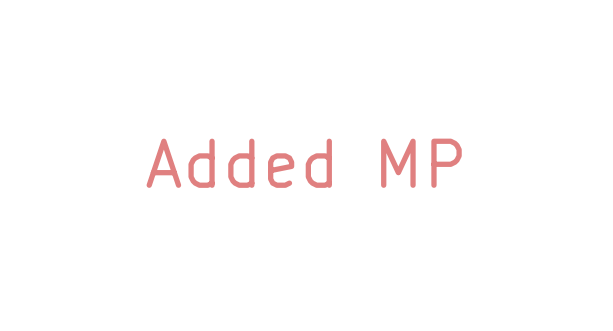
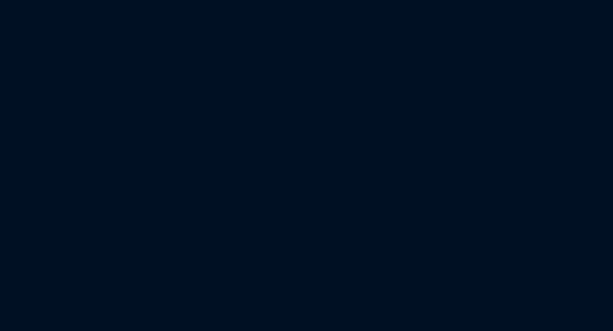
text: Added MP (304, 163) -> none

